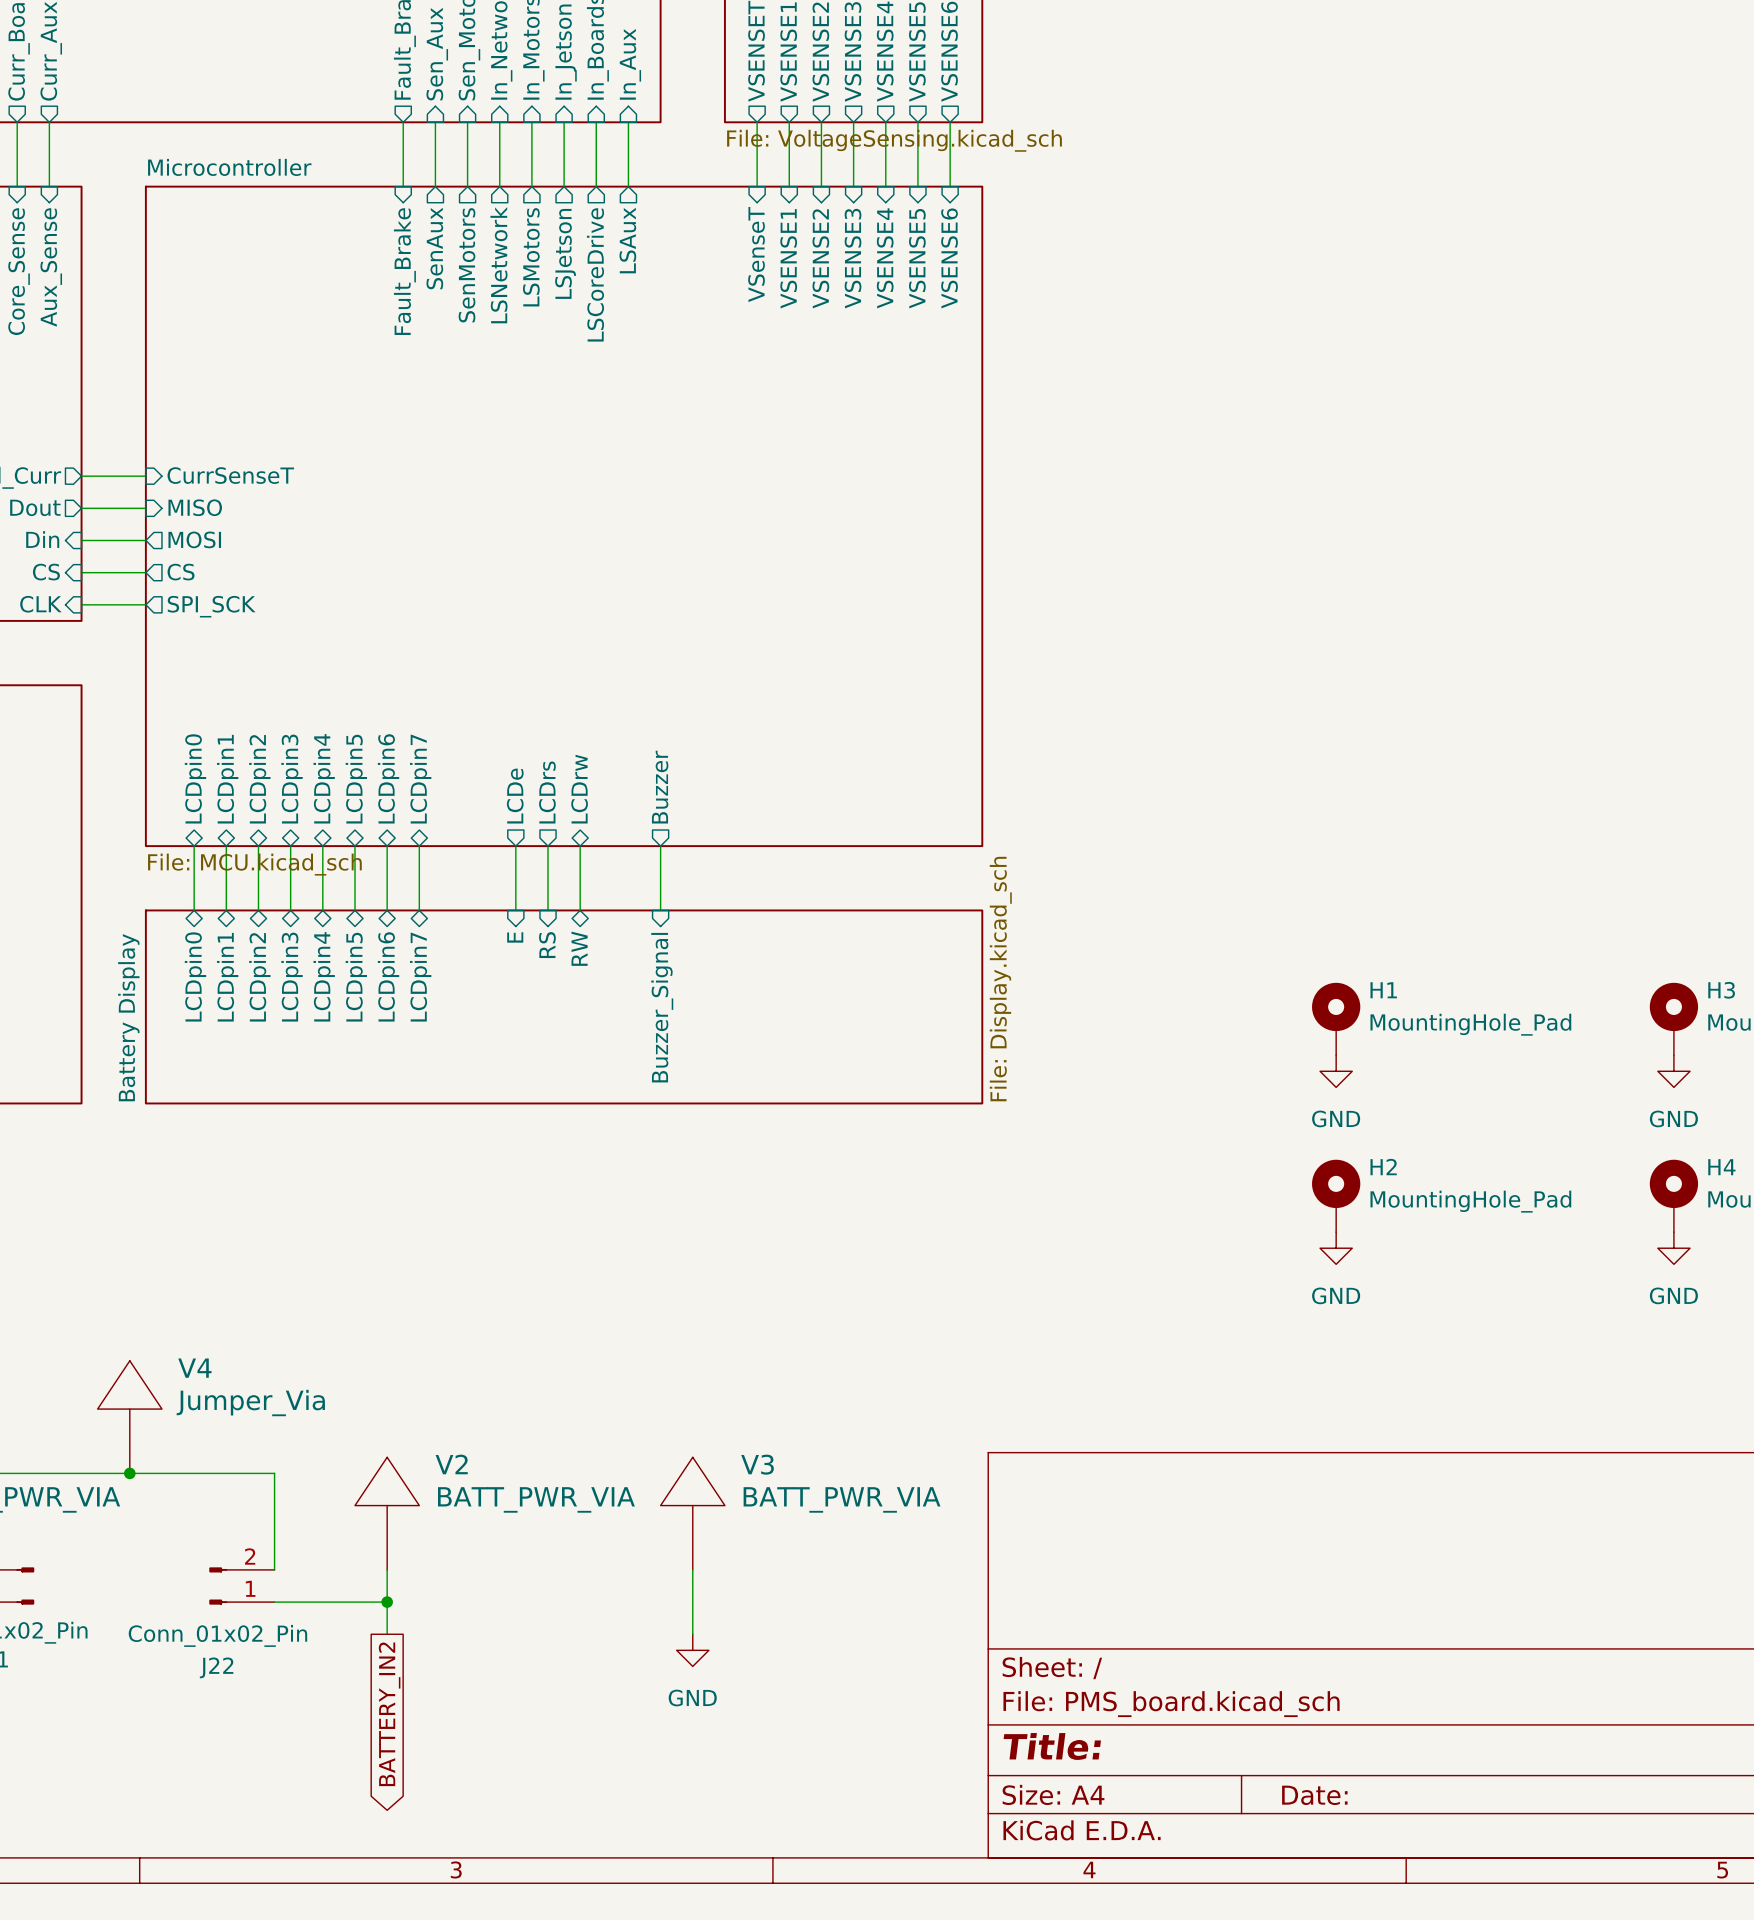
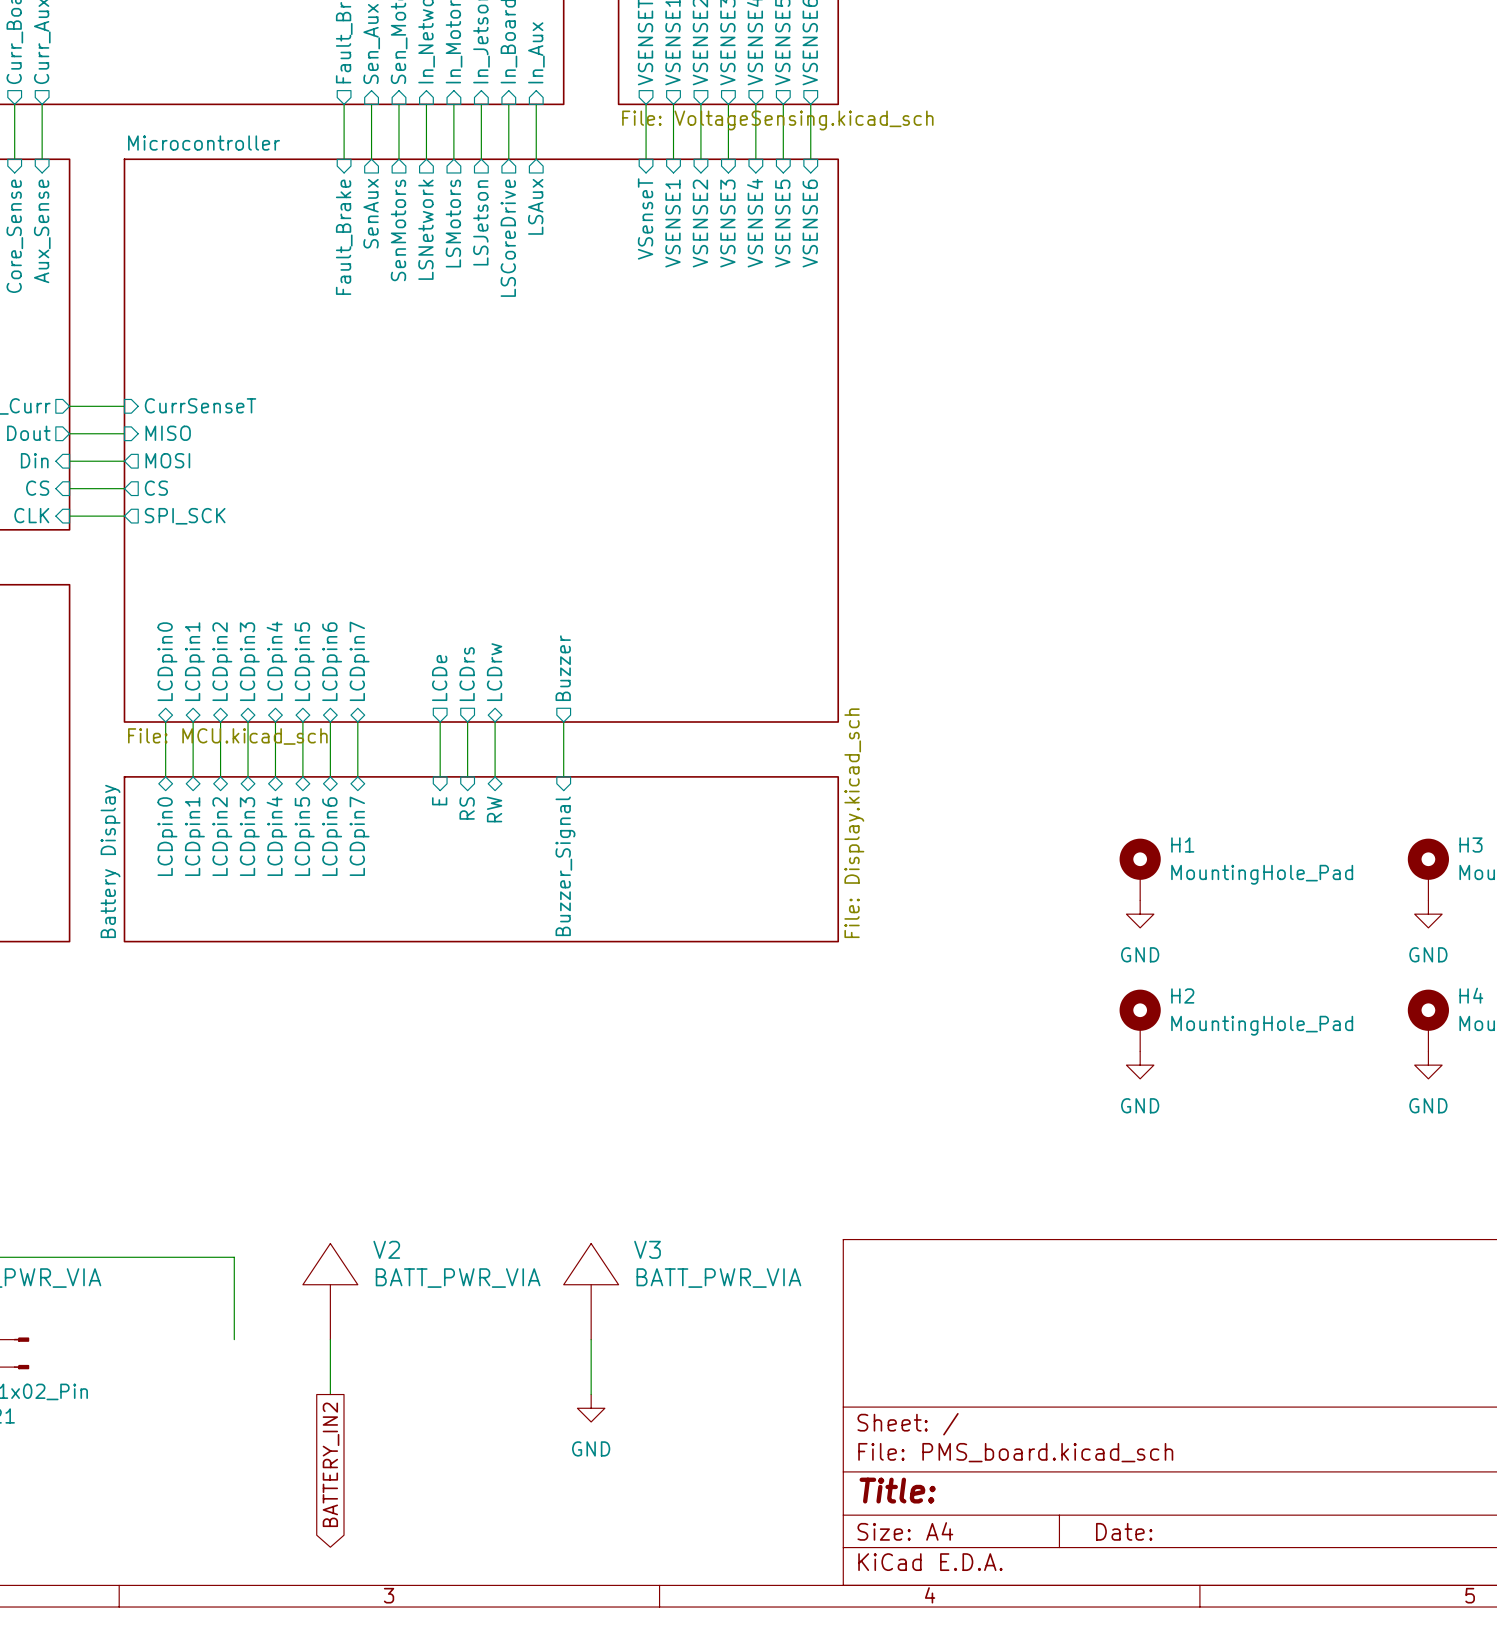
V4: Jumper_Via (129, 1417) -> none
junction: (129, 1473) -> none
J22: Conn_01x02_Pin (241, 1586) -> none
wire: (274, 1602) (387, 1602) -> none
junction: (387, 1602) -> none

